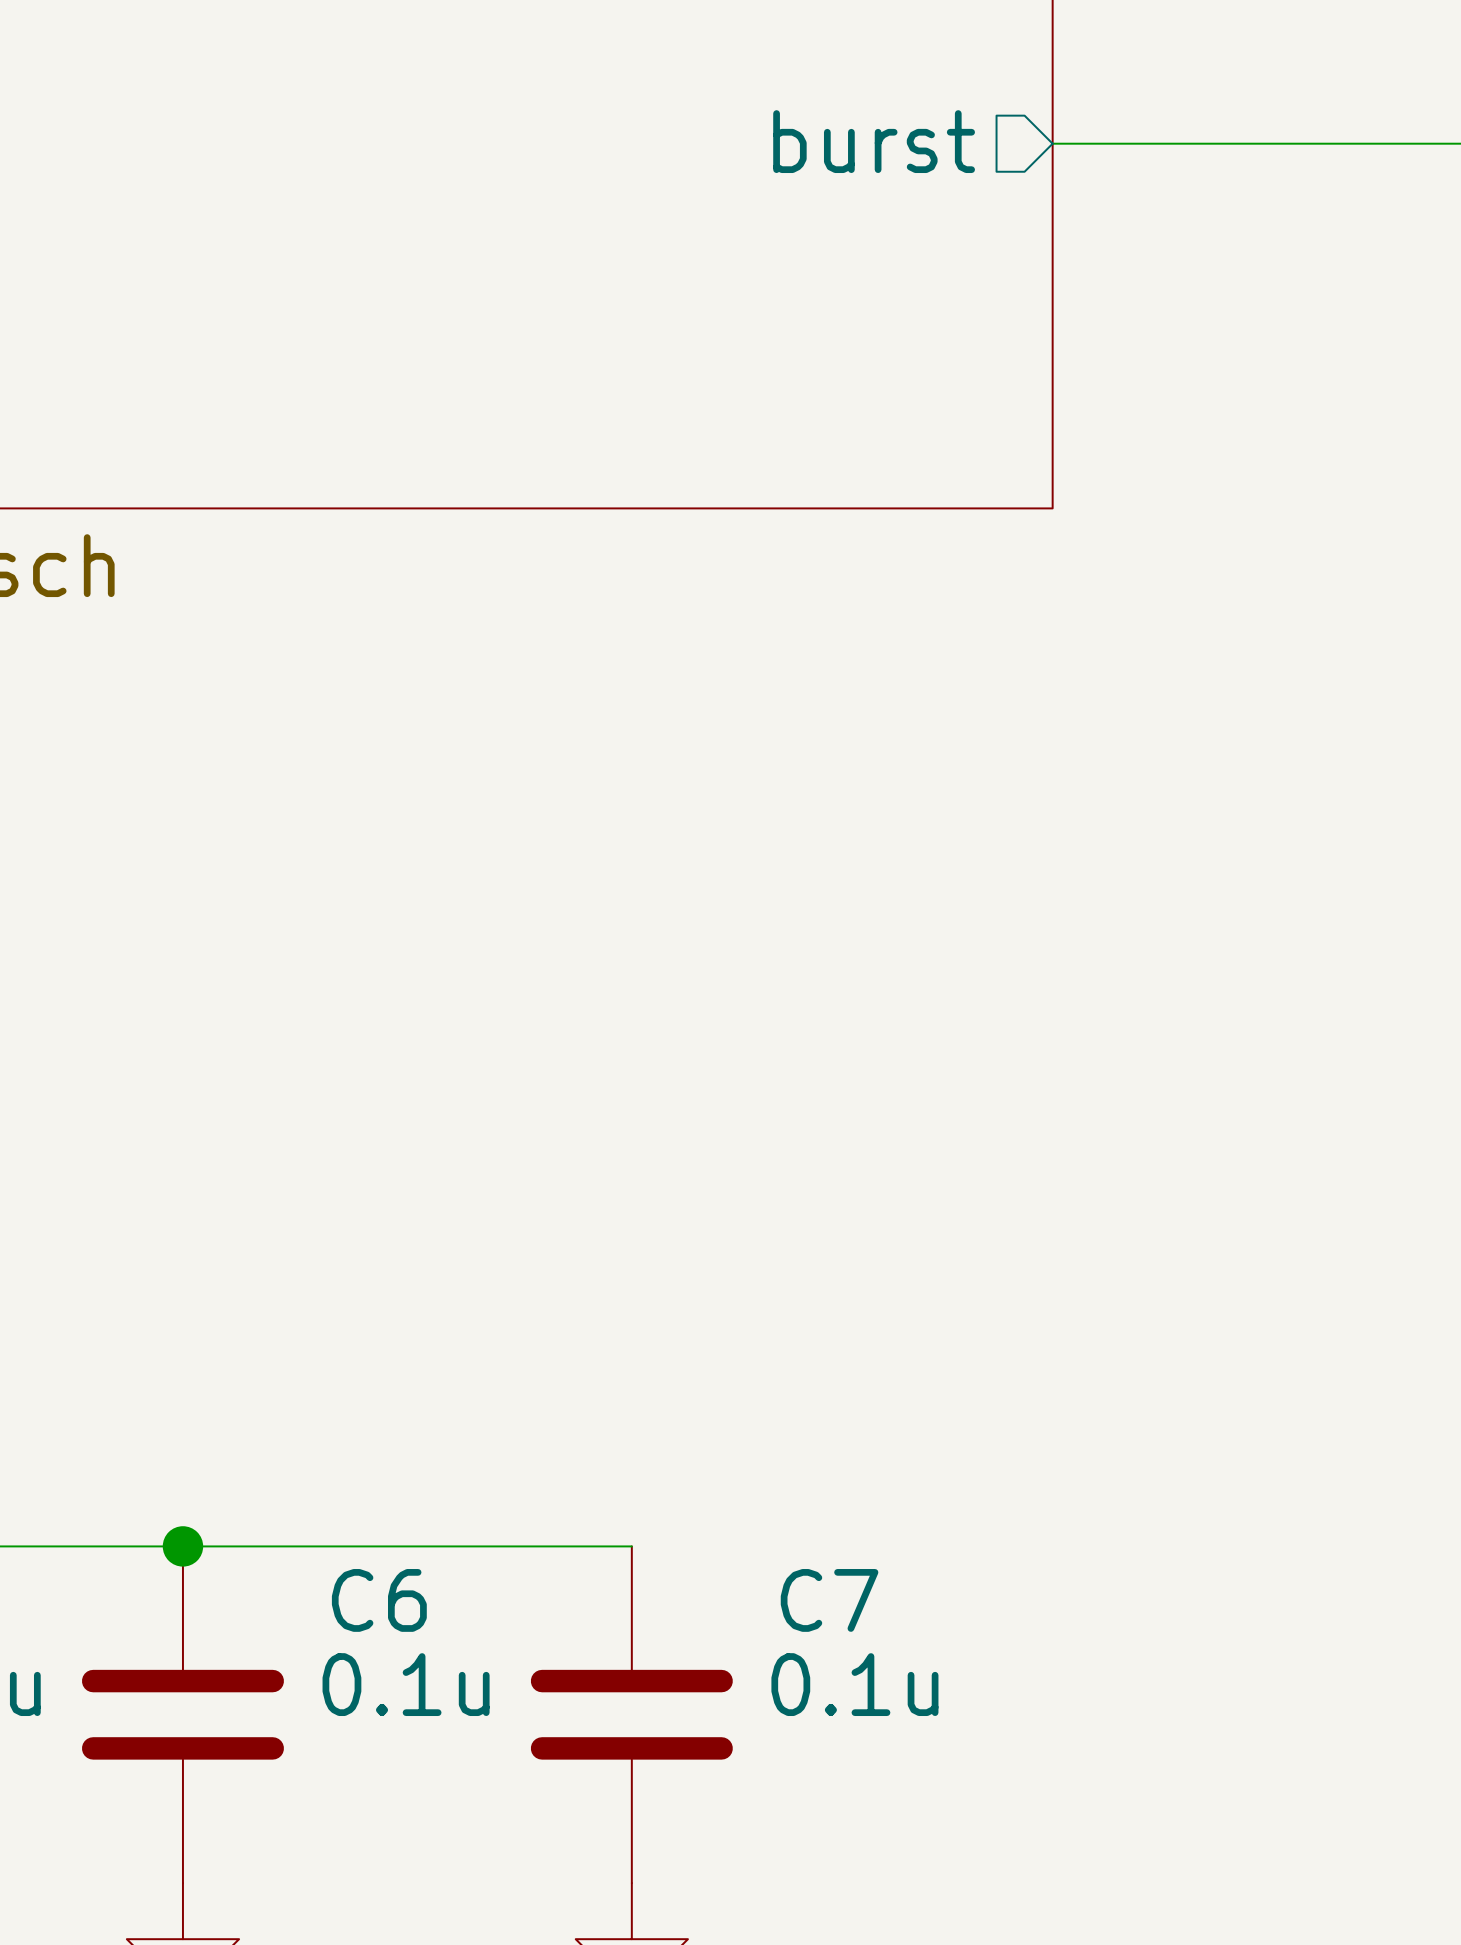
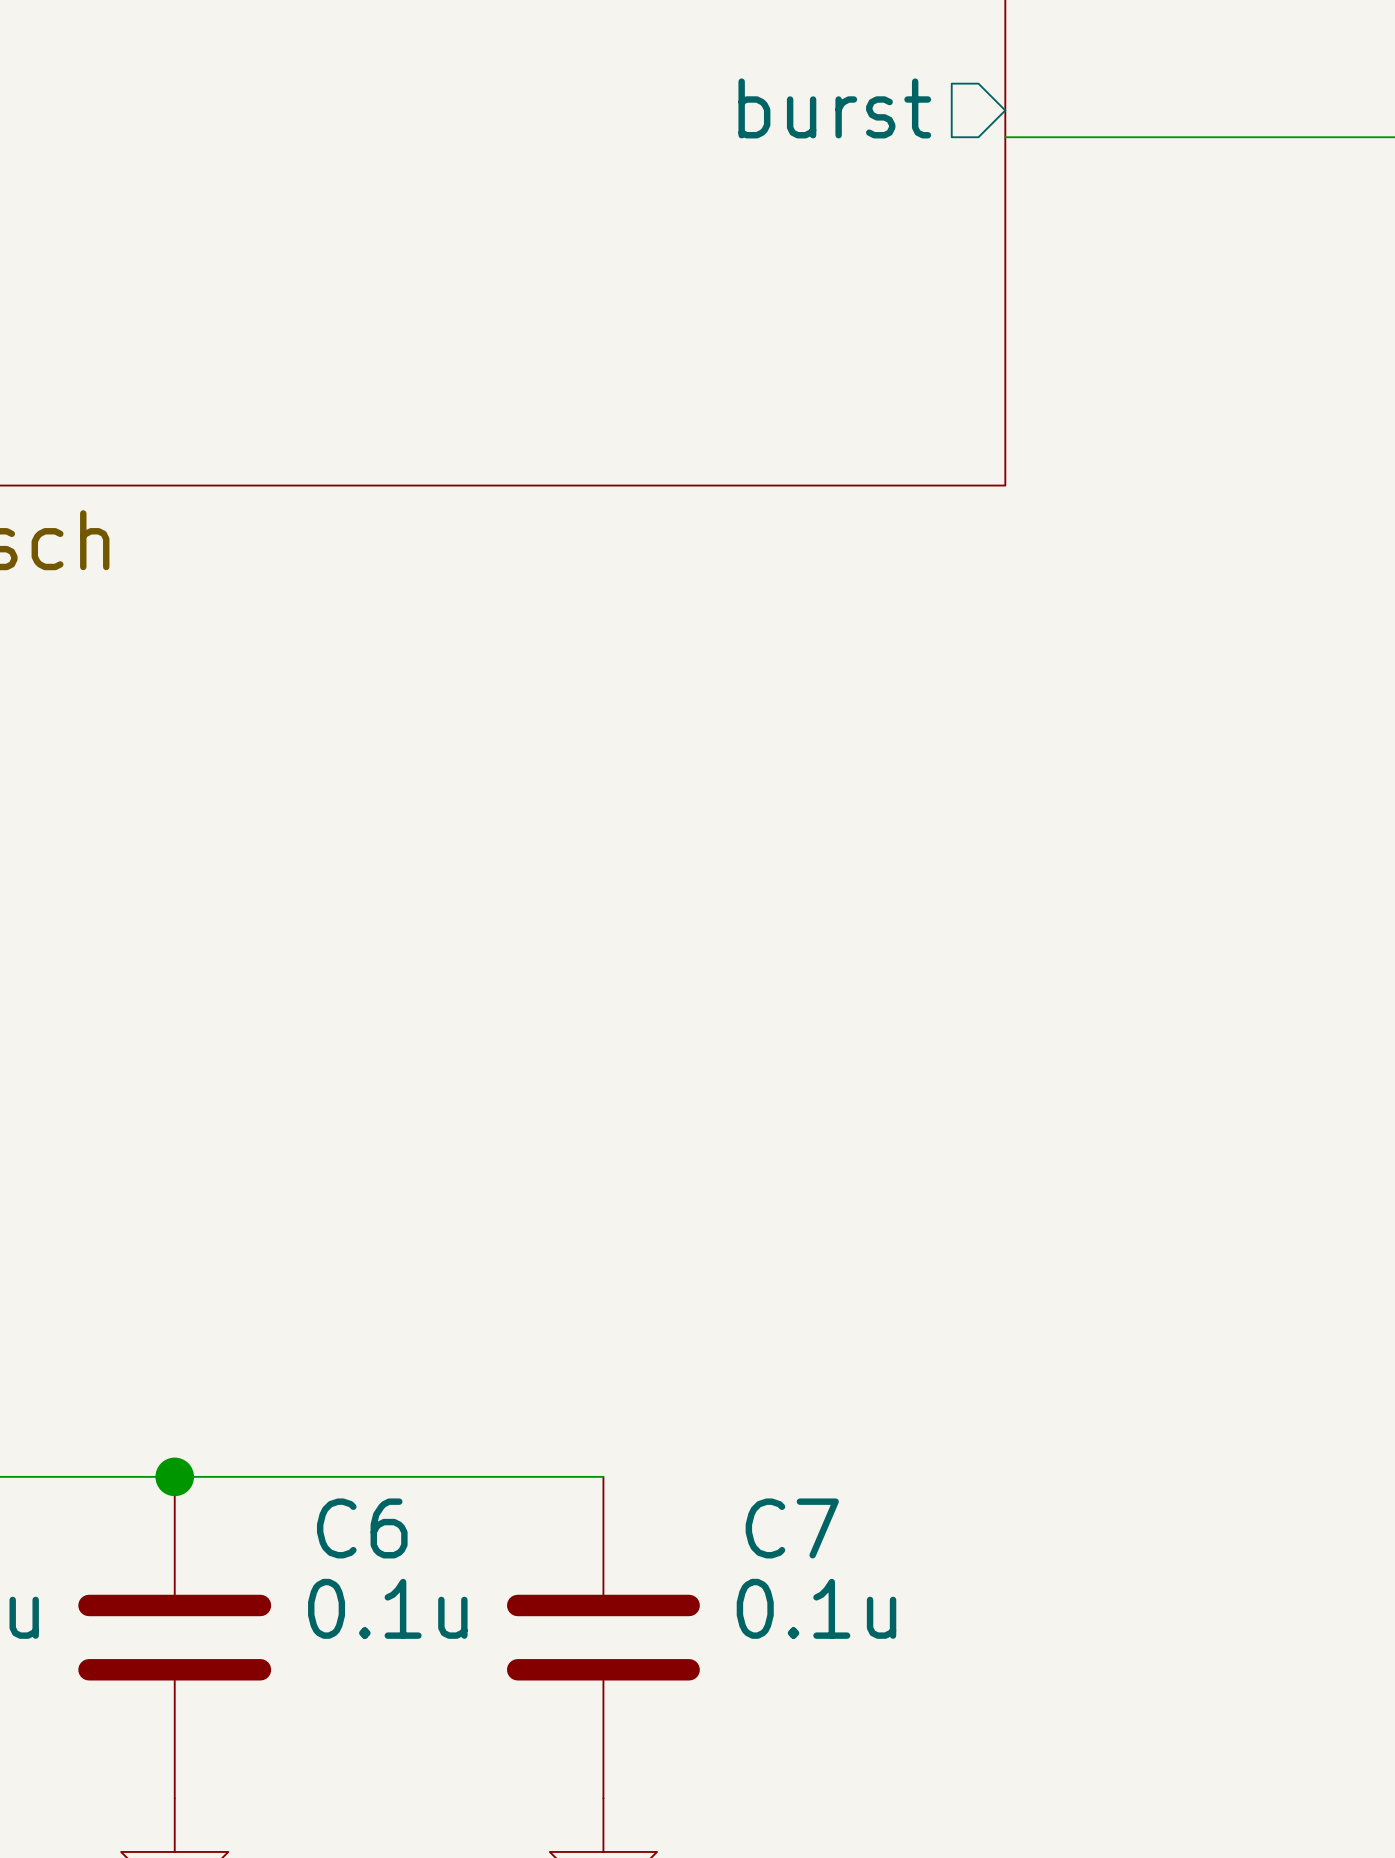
sheet pin position: burst (874, 141) -> burst (834, 108)

